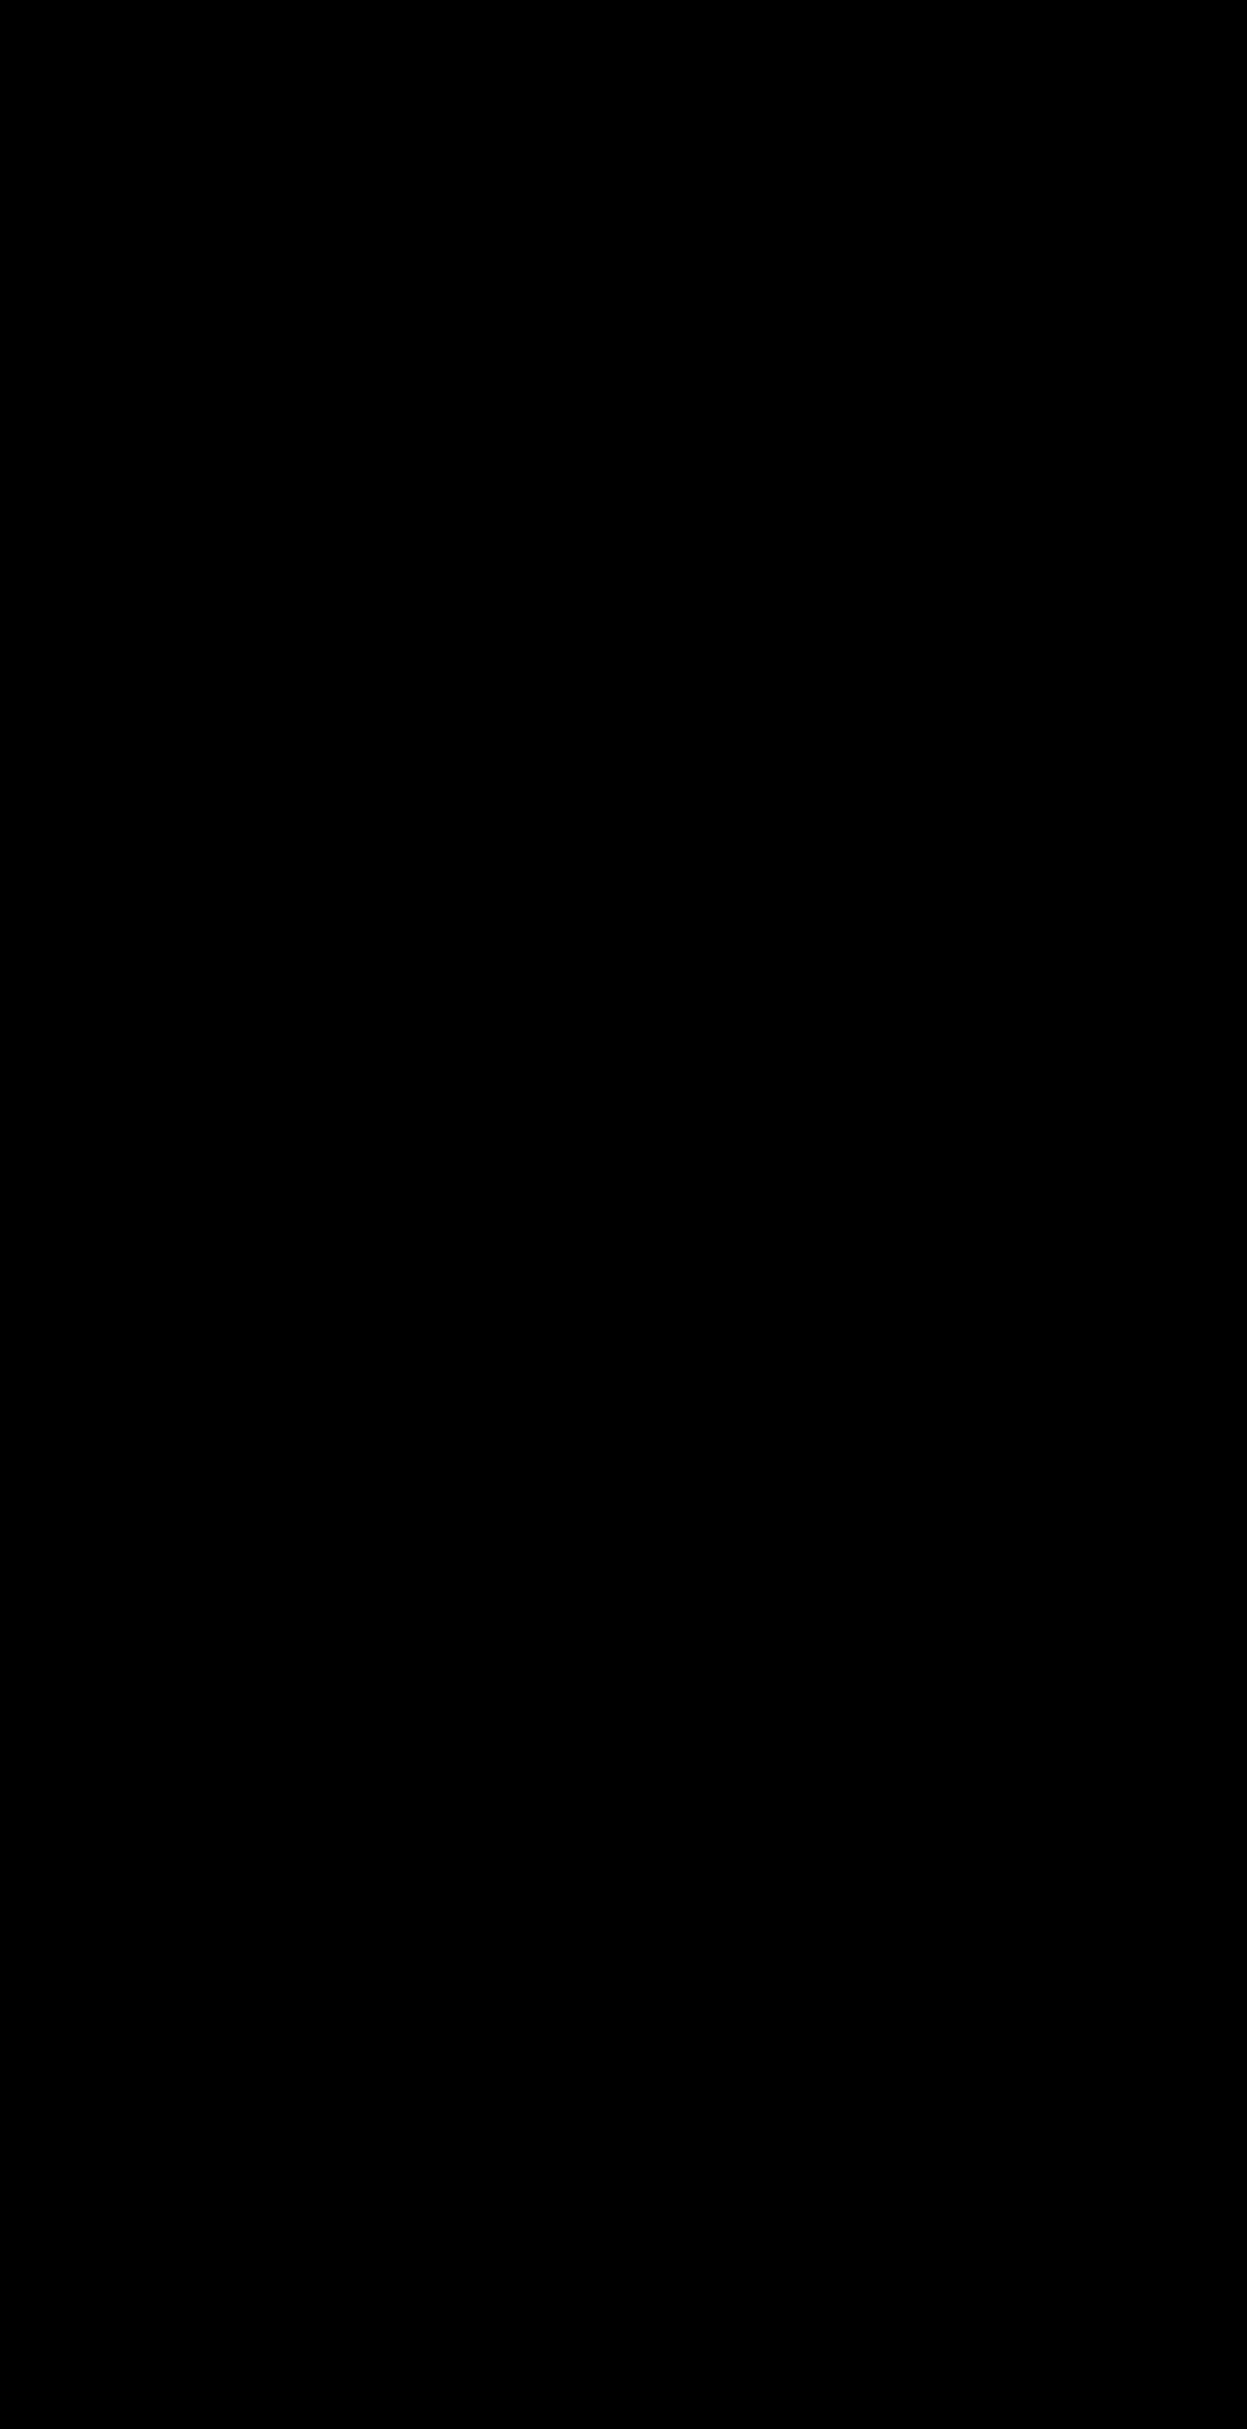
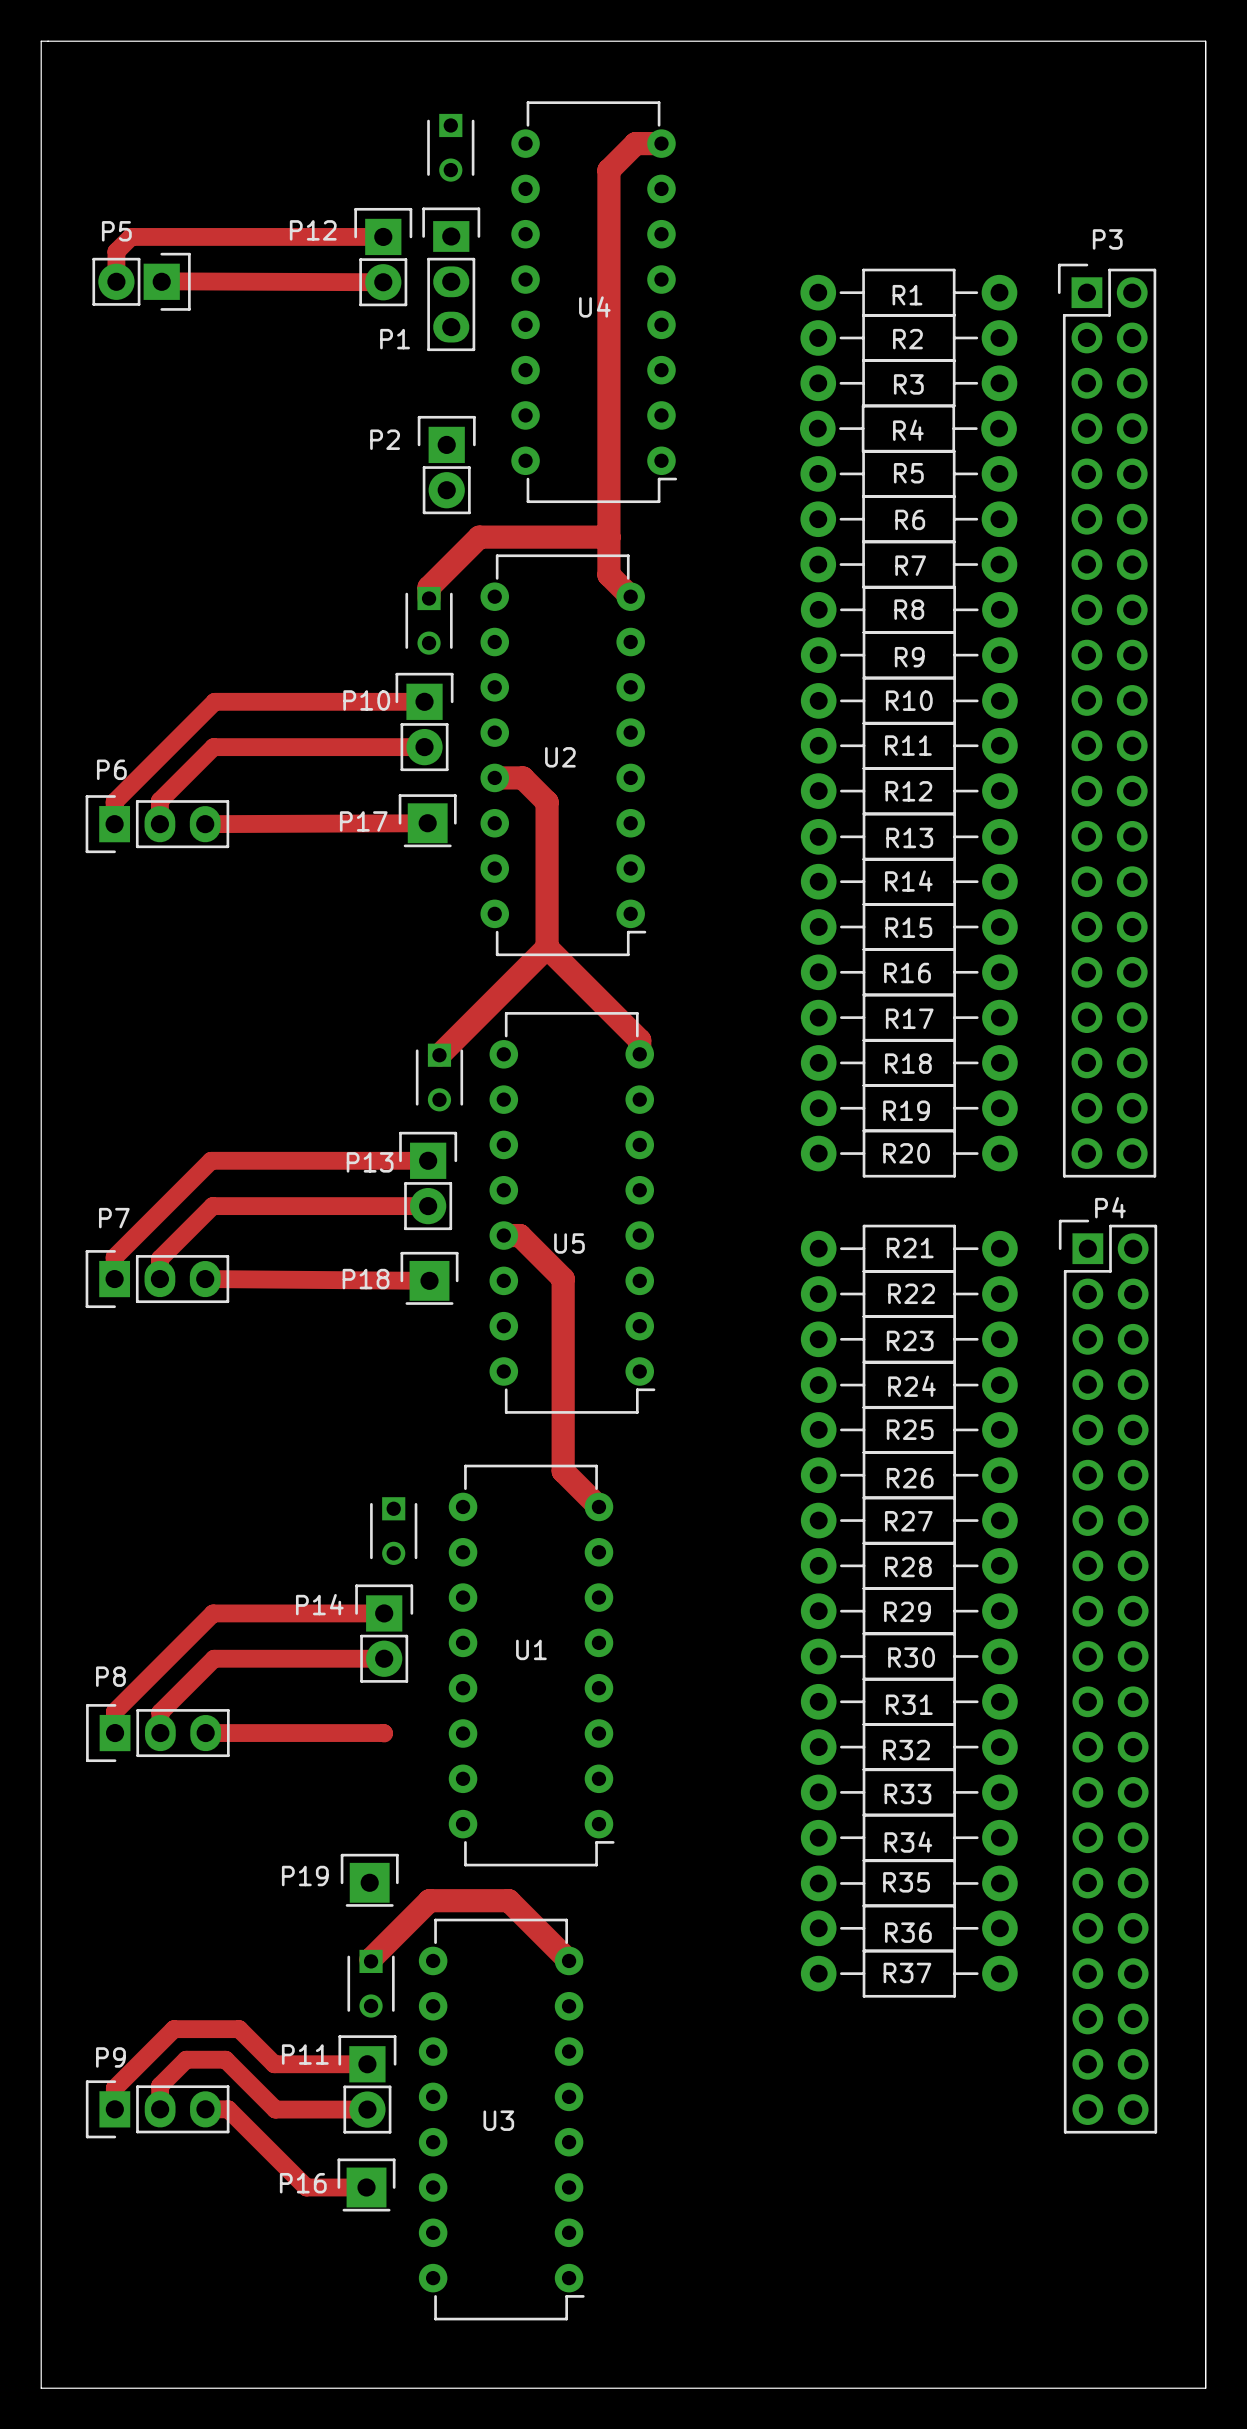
board edge: none -> (41, 41) (1205, 41) (1205, 2388) (41, 2388) (41, 41)
track: none -> (661, 143) (635, 143) (608, 170) (608, 574) (630, 596)
part: none -> (450, 147)
track: none -> (383, 236) (131, 236) (116, 251) (116, 281)
P12: none -> (383, 257)
P1: none -> (451, 279)
P5: none -> (141, 281)
track: none -> (161, 281) (383, 282)
R1: none -> (908, 292)
U4: none -> (594, 302)
R2: none -> (908, 337)
R3: none -> (908, 383)
R4: none -> (908, 428)
P2: none -> (446, 465)
R5: none -> (908, 473)
R6: none -> (908, 519)
track: none -> (608, 537) (479, 537) (429, 587) (429, 598)
R7: none -> (908, 564)
R8: none -> (909, 609)
part: none -> (429, 620)
R9: none -> (909, 655)
R10: none -> (909, 700)
track: none -> (424, 701) (214, 701) (114, 801) (114, 824)
P3: none -> (1107, 720)
P10: none -> (424, 721)
R11: none -> (909, 745)
track: none -> (424, 747) (213, 747) (159, 800) (159, 824)
U2: none -> (563, 755)
track: none -> (494, 777) (522, 777) (547, 802) (547, 947)
R12: none -> (909, 791)
P17: none -> (427, 820)
track: none -> (427, 823) (205, 824)
P6: none -> (157, 824)
R13: none -> (909, 836)
R14: none -> (909, 881)
R15: none -> (909, 927)
track: none -> (547, 947) (639, 1040) (639, 1054)
track: none -> (547, 947) (439, 1055)
R16: none -> (909, 972)
R17: none -> (909, 1017)
R18: none -> (909, 1062)
part: none -> (439, 1077)
R19: none -> (909, 1108)
R20: none -> (909, 1153)
track: none -> (428, 1160) (211, 1160) (114, 1257) (114, 1279)
P13: none -> (428, 1180)
track: none -> (428, 1206) (212, 1206) (159, 1258) (159, 1279)
U5: none -> (572, 1212)
track: none -> (503, 1235) (519, 1235) (563, 1278) (563, 1471) (598, 1506)
R21: none -> (909, 1248)
P18: none -> (429, 1278)
P7: none -> (157, 1279)
track: none -> (205, 1279) (429, 1280)
R22: none -> (909, 1294)
R23: none -> (909, 1339)
R24: none -> (909, 1385)
R25: none -> (909, 1429)
R26: none -> (909, 1475)
R27: none -> (909, 1520)
part: none -> (393, 1531)
R28: none -> (909, 1565)
R29: none -> (909, 1611)
track: none -> (384, 1613) (213, 1613) (115, 1711) (115, 1733)
P14: none -> (384, 1633)
R30: none -> (909, 1656)
track: none -> (384, 1658) (214, 1658) (160, 1712) (160, 1733)
U1: none -> (531, 1665)
P4: none -> (1108, 1676)
R31: none -> (909, 1701)
P8: none -> (157, 1733)
track: none -> (205, 1733) (384, 1733)
R32: none -> (909, 1747)
R33: none -> (909, 1792)
R34: none -> (909, 1837)
P19: none -> (369, 1880)
R35: none -> (909, 1883)
R36: none -> (909, 1928)
track: none -> (569, 1960) (508, 1900) (429, 1900) (371, 1959) (371, 1961)
R37: none -> (909, 1973)
part: none -> (371, 1983)
track: none -> (367, 2064) (274, 2064) (239, 2029) (173, 2029) (114, 2088) (114, 2109)
P11: none -> (367, 2084)
P9: none -> (157, 2109)
track: none -> (160, 2109) (160, 2085) (186, 2059) (225, 2059) (275, 2109) (367, 2109)
track: none -> (205, 2109) (228, 2109) (306, 2187) (366, 2187)
U3: none -> (501, 2119)
P16: none -> (366, 2185)

